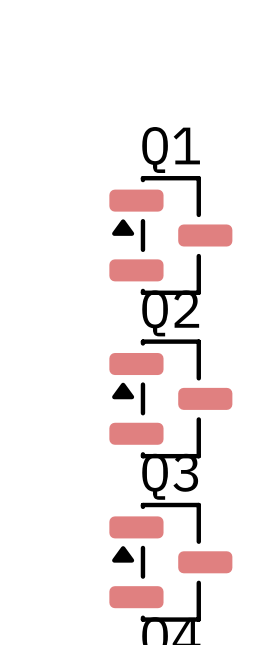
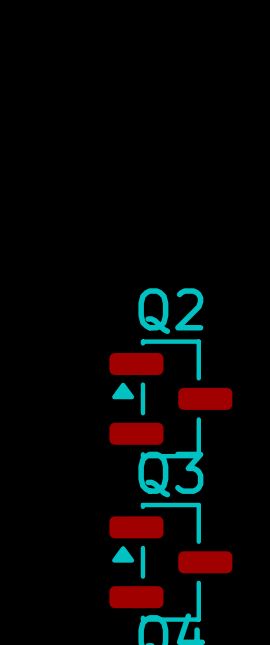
Q1: (170, 235) -> none

